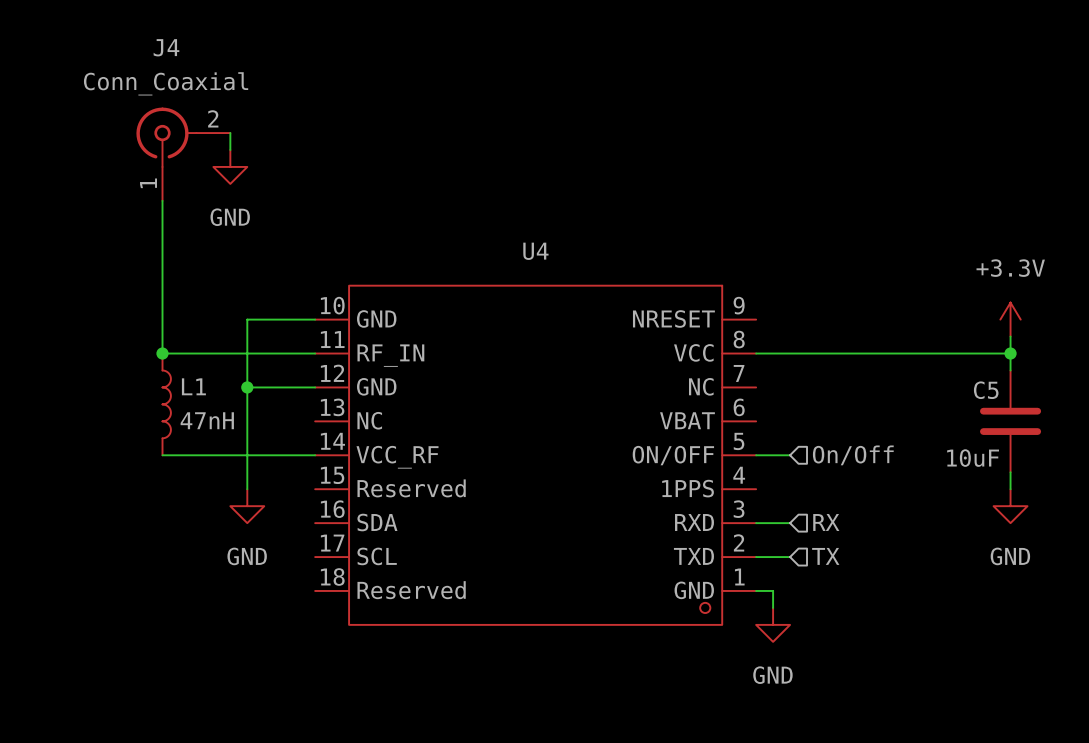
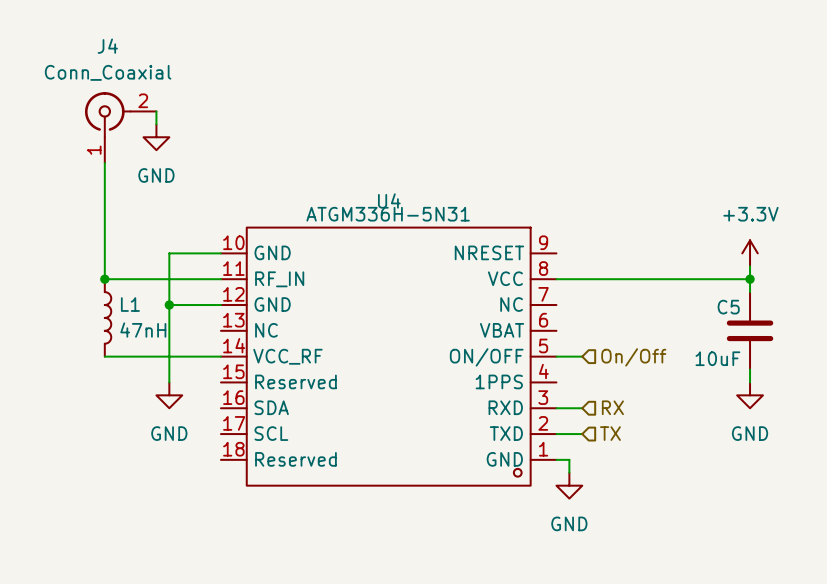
U4 value: none -> ATGM336H-5N31 (388, 214)

